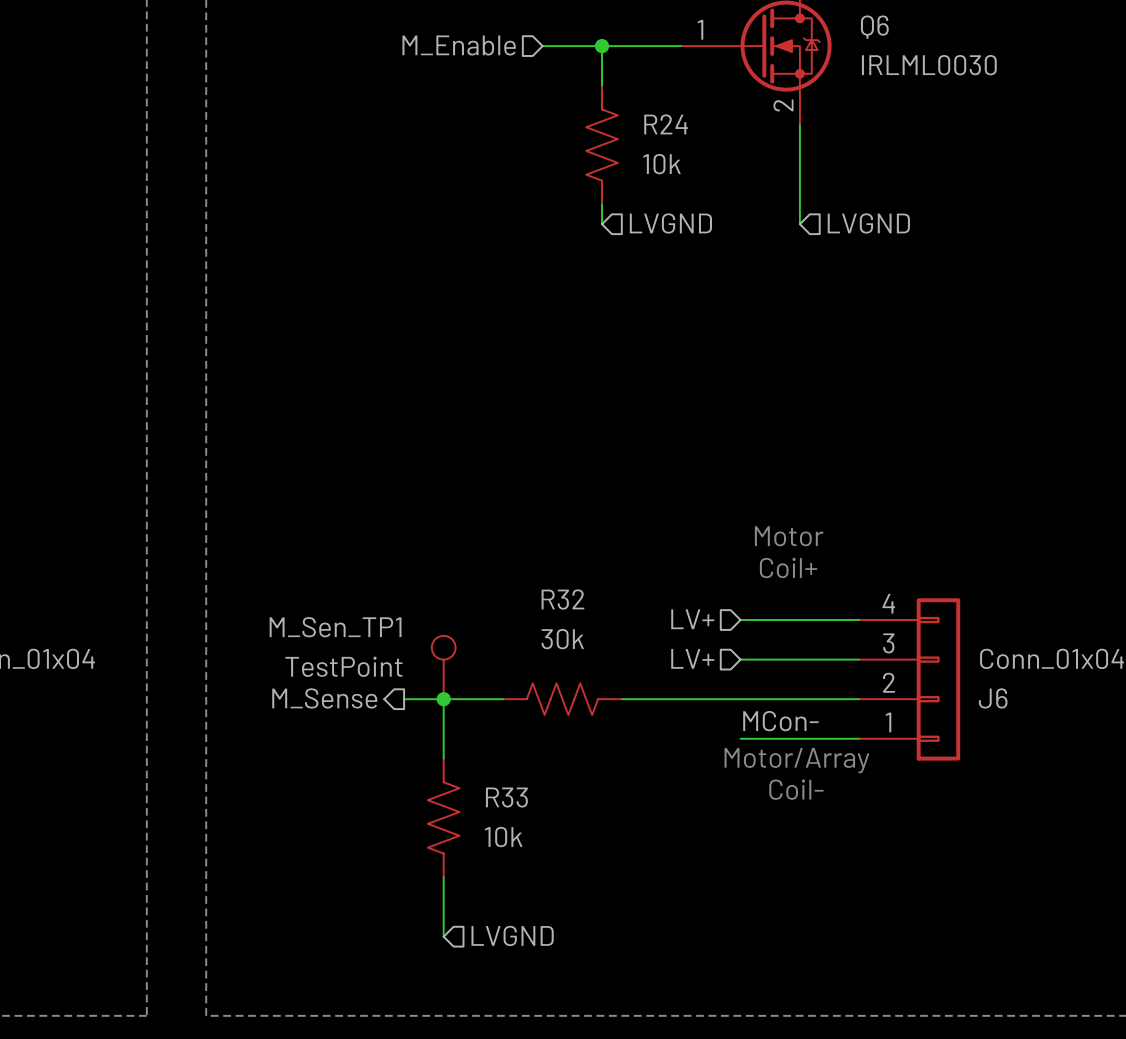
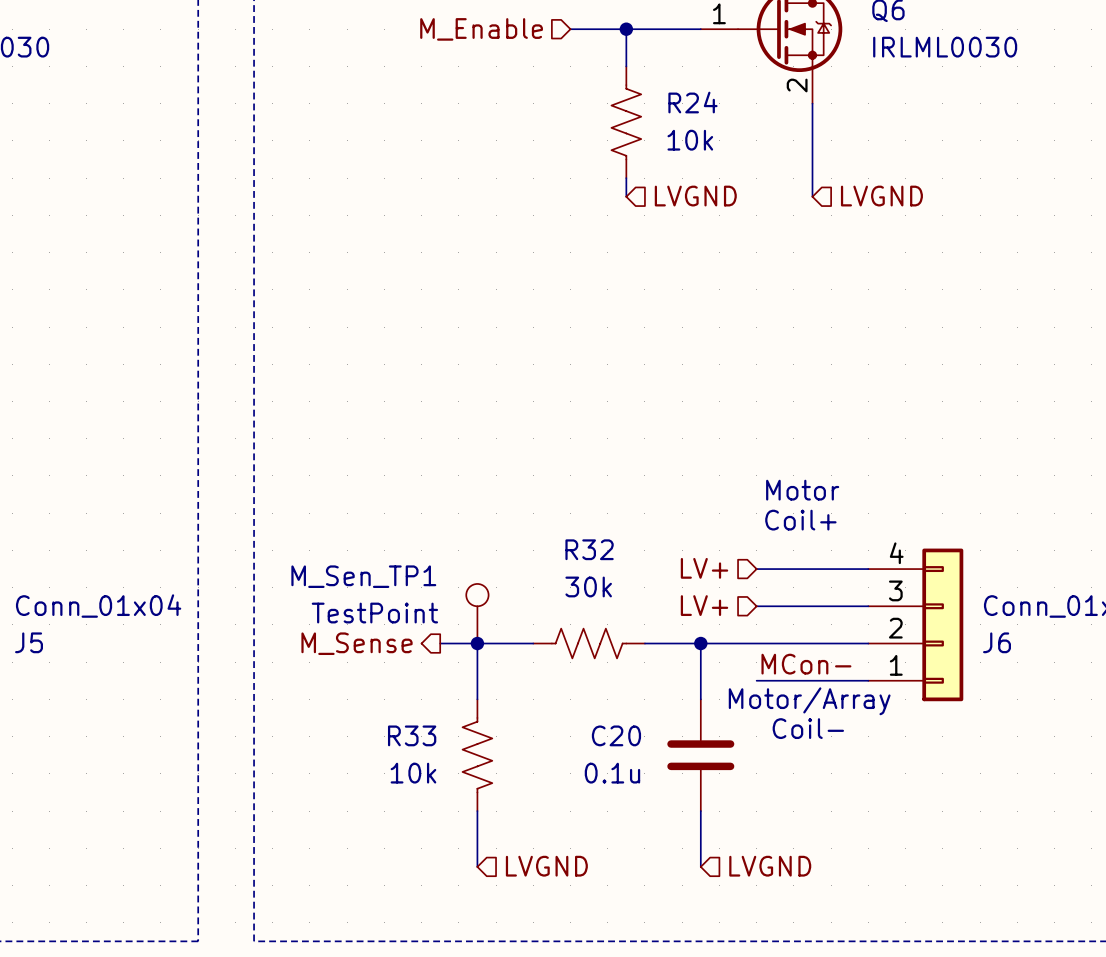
wire: none -> (700, 643) (700, 699)
junction: none -> (700, 643)
R33 flip: as is (443, 817) -> left-right (477, 755)
C20: none -> 0.1u (700, 755)
wire: none -> (700, 811) (700, 866)
hierarchical label: none -> LVGND (770, 866)

